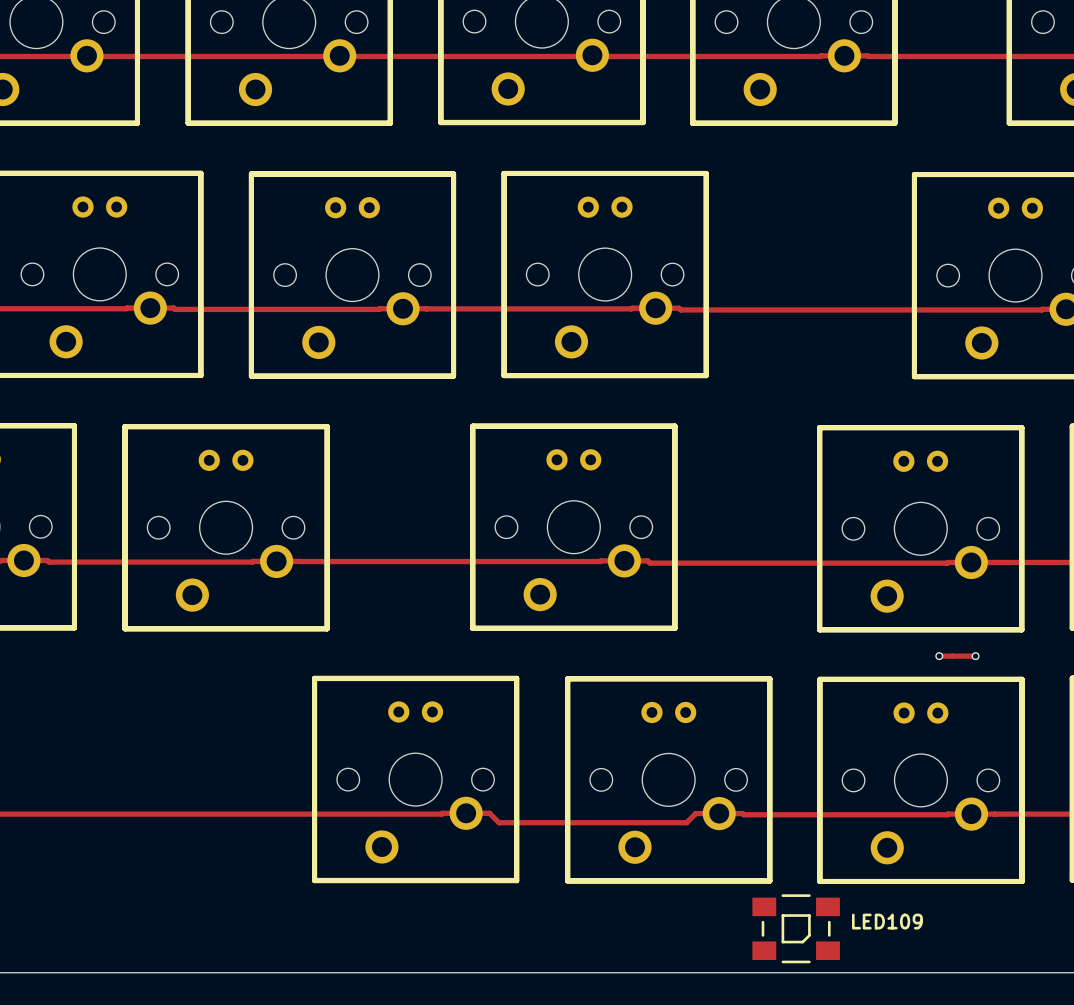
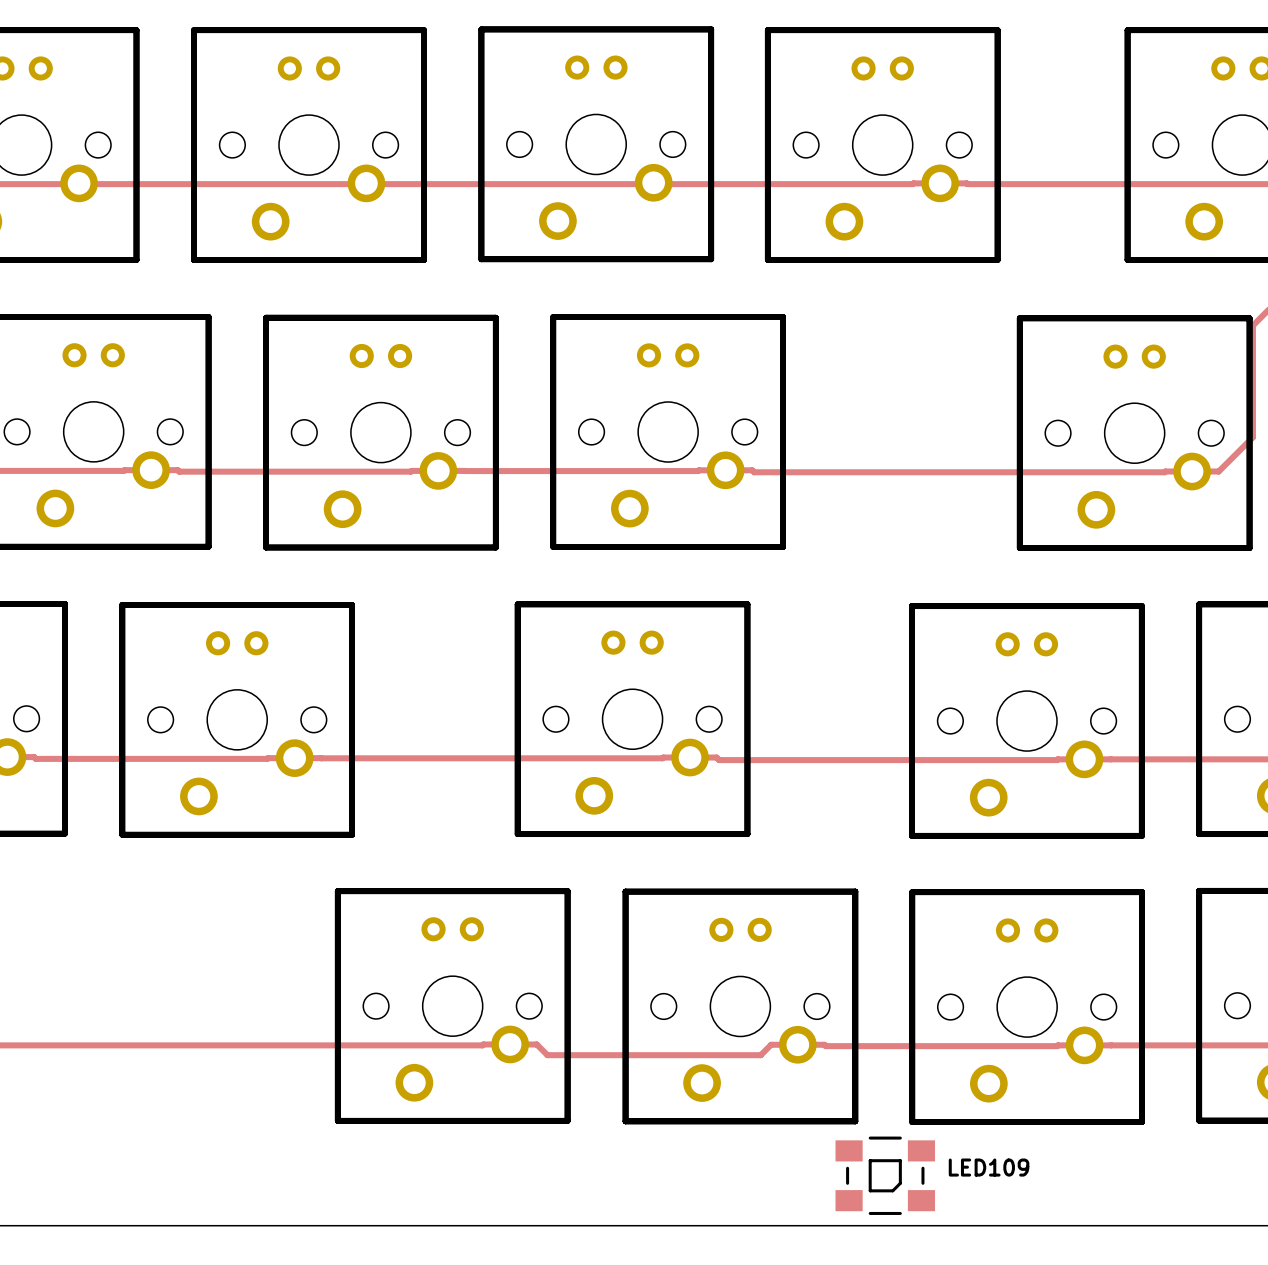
track: (939, 656) (975, 656) -> none
via: (939, 656) -> none
via: (975, 656) -> none

